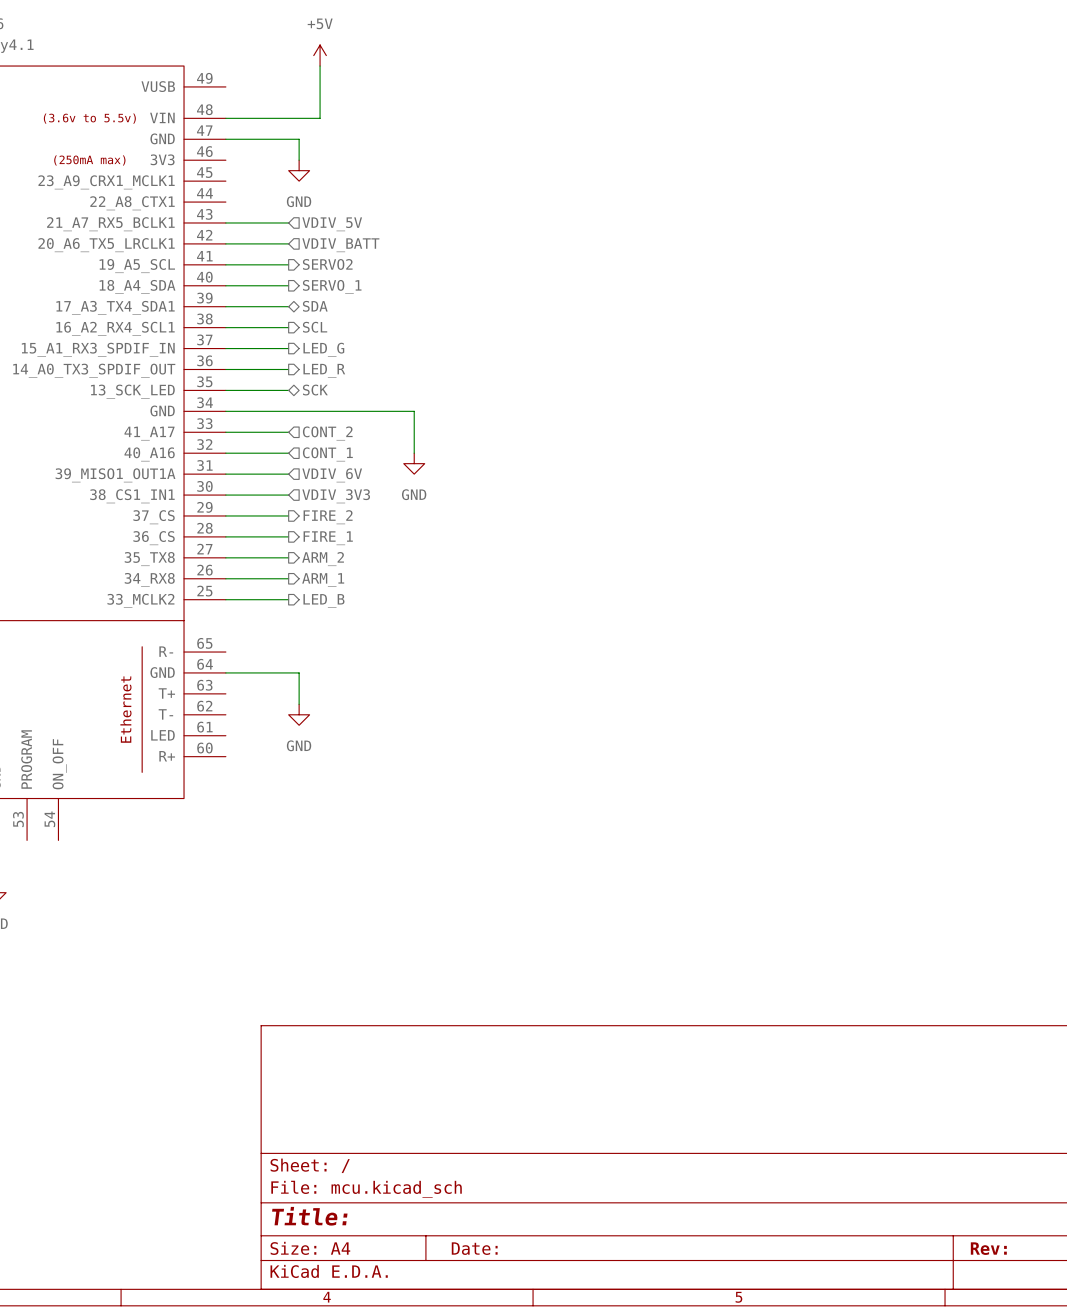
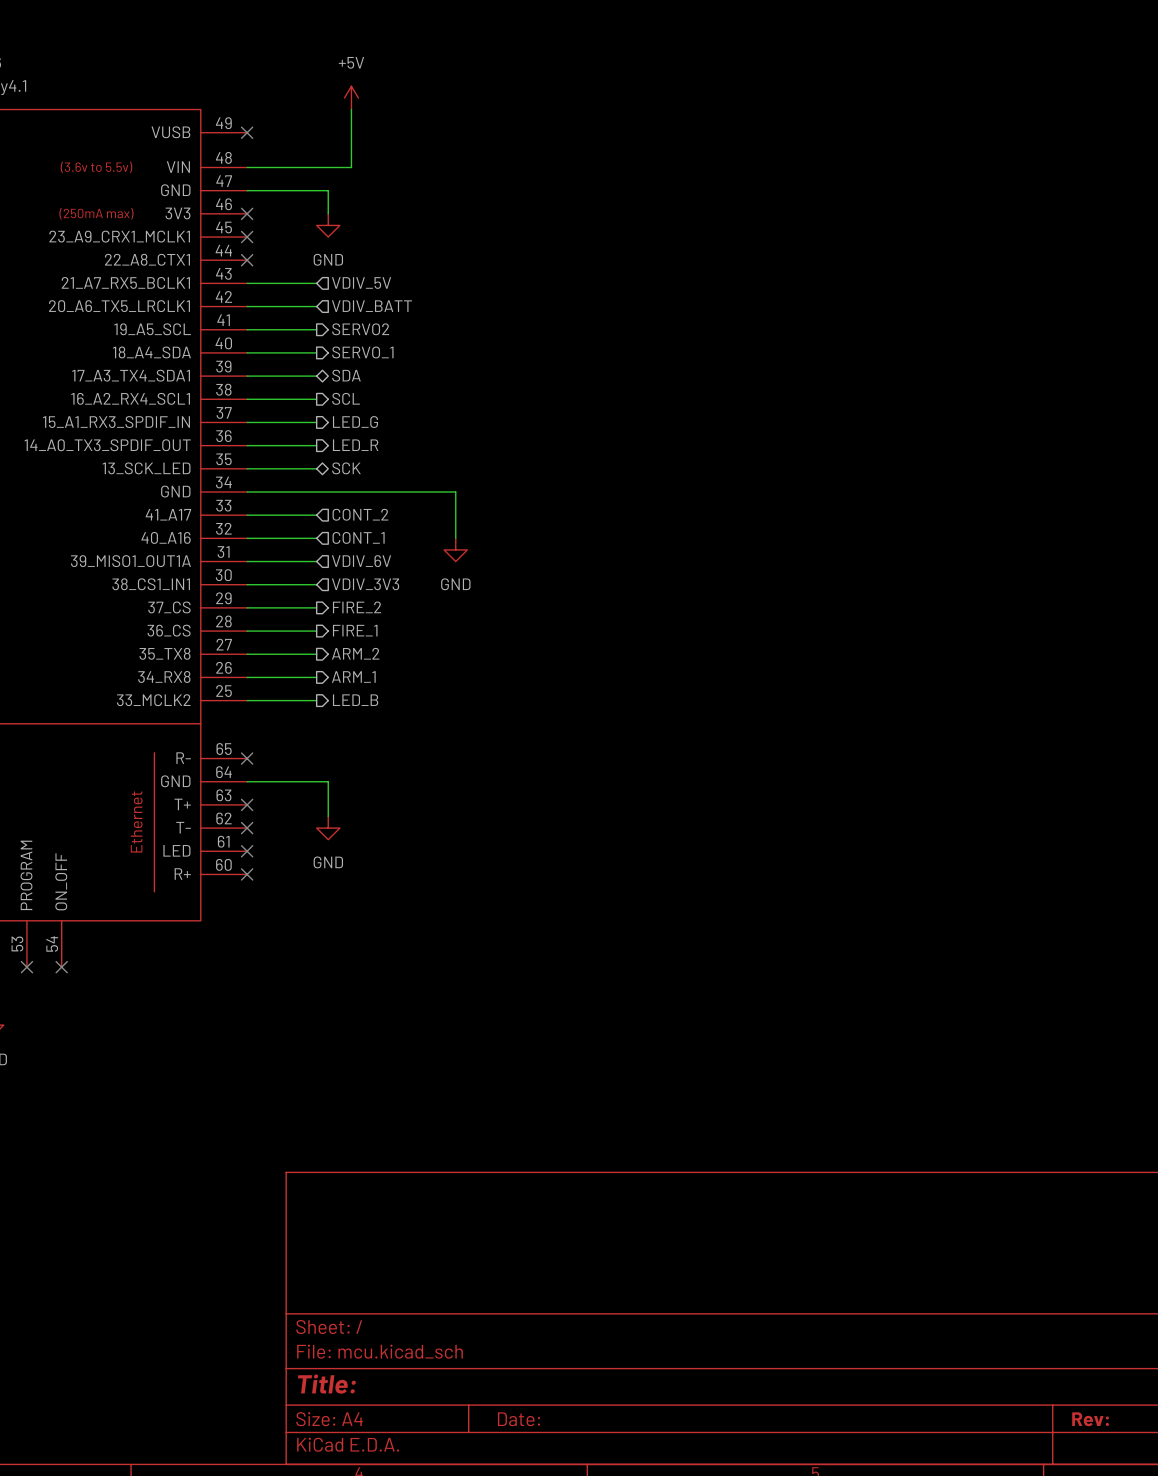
no-connect mark: none -> (247, 132)
no-connect mark: none -> (247, 213)
no-connect mark: none -> (247, 237)
no-connect mark: none -> (247, 260)
no-connect mark: none -> (247, 758)
no-connect mark: none -> (247, 804)
no-connect mark: none -> (247, 828)
no-connect mark: none -> (247, 851)
no-connect mark: none -> (247, 874)
no-connect mark: none -> (26, 967)
no-connect mark: none -> (61, 967)

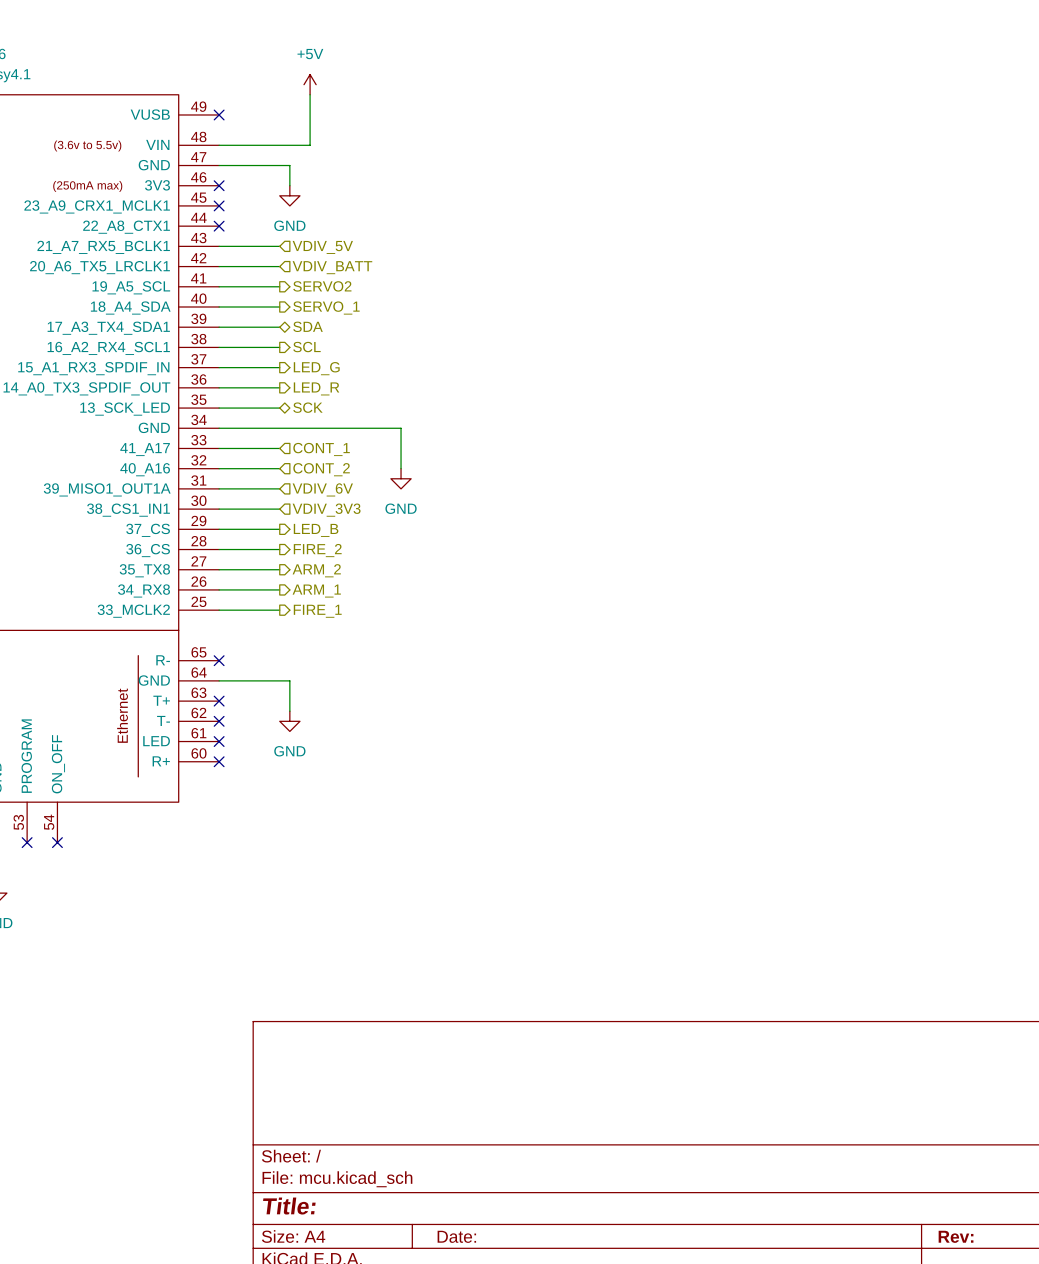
hierarchical label: CONT_2 (360, 514) -> CONT_1 (321, 449)
hierarchical label: CONT_1 (358, 537) -> CONT_2 (321, 469)
hierarchical label: FIRE_2 (357, 607) -> LED_B (316, 530)
hierarchical label: FIRE_1 (355, 630) -> FIRE_2 (317, 550)
hierarchical label: LED_B (355, 700) -> FIRE_1 (317, 611)

